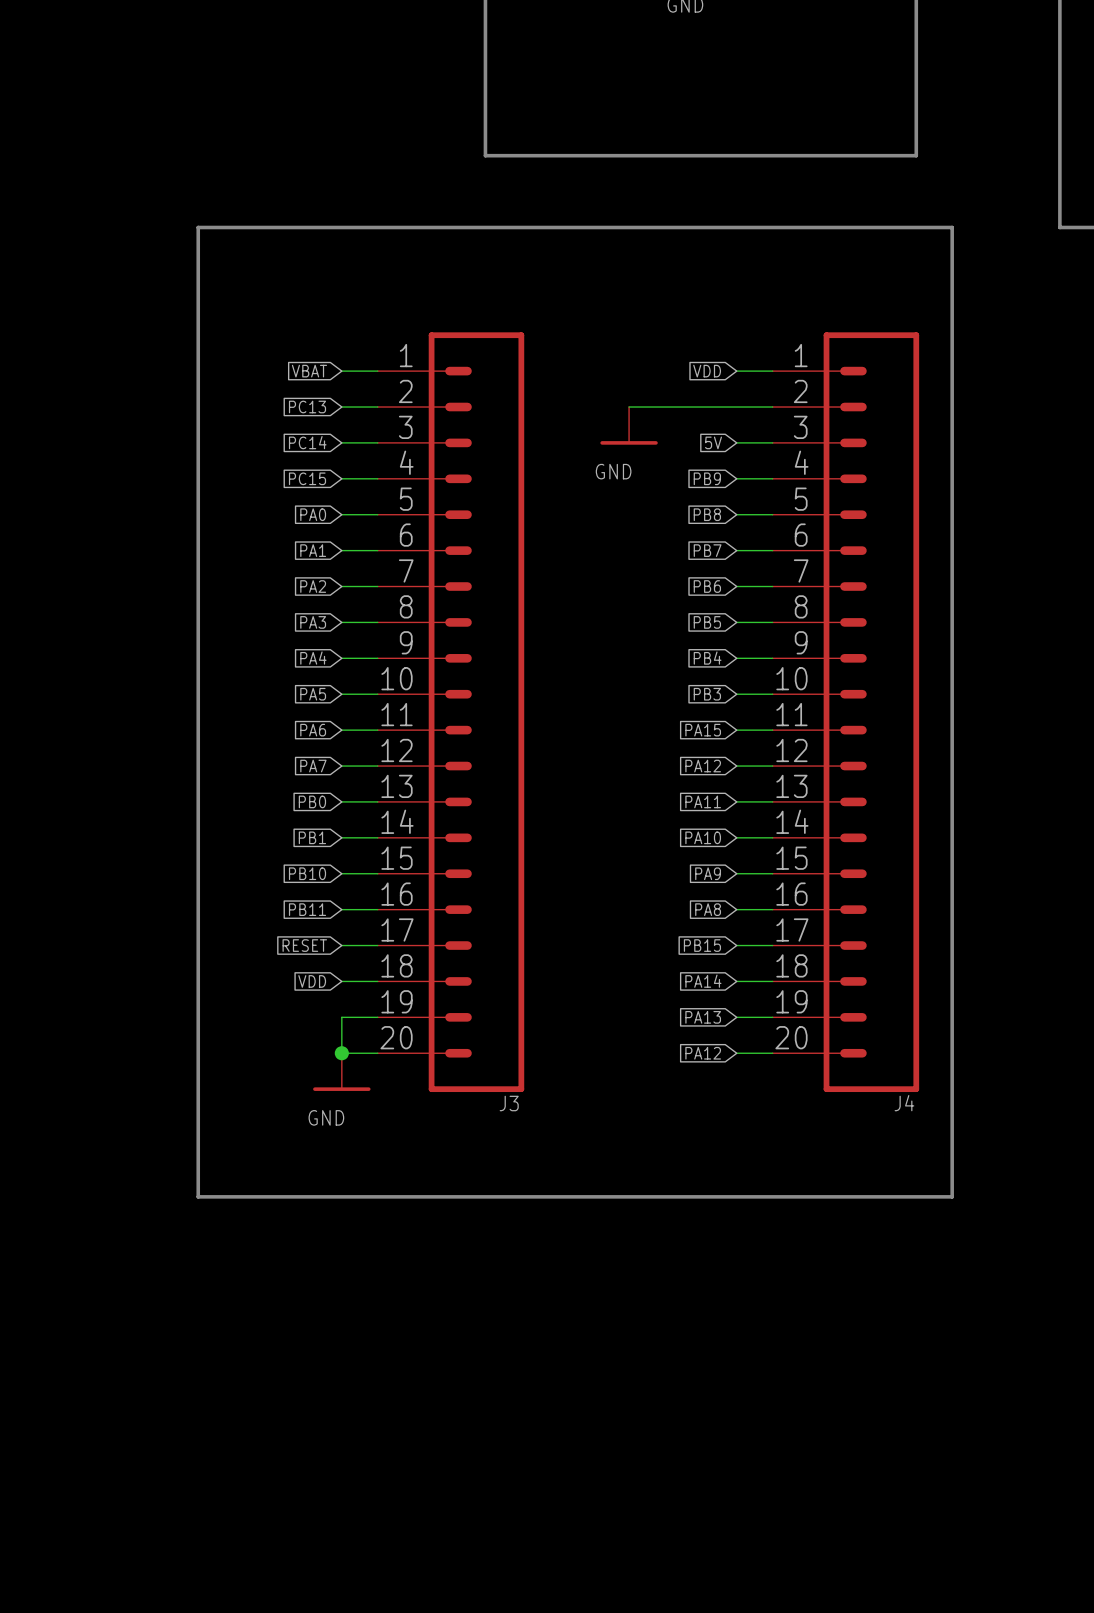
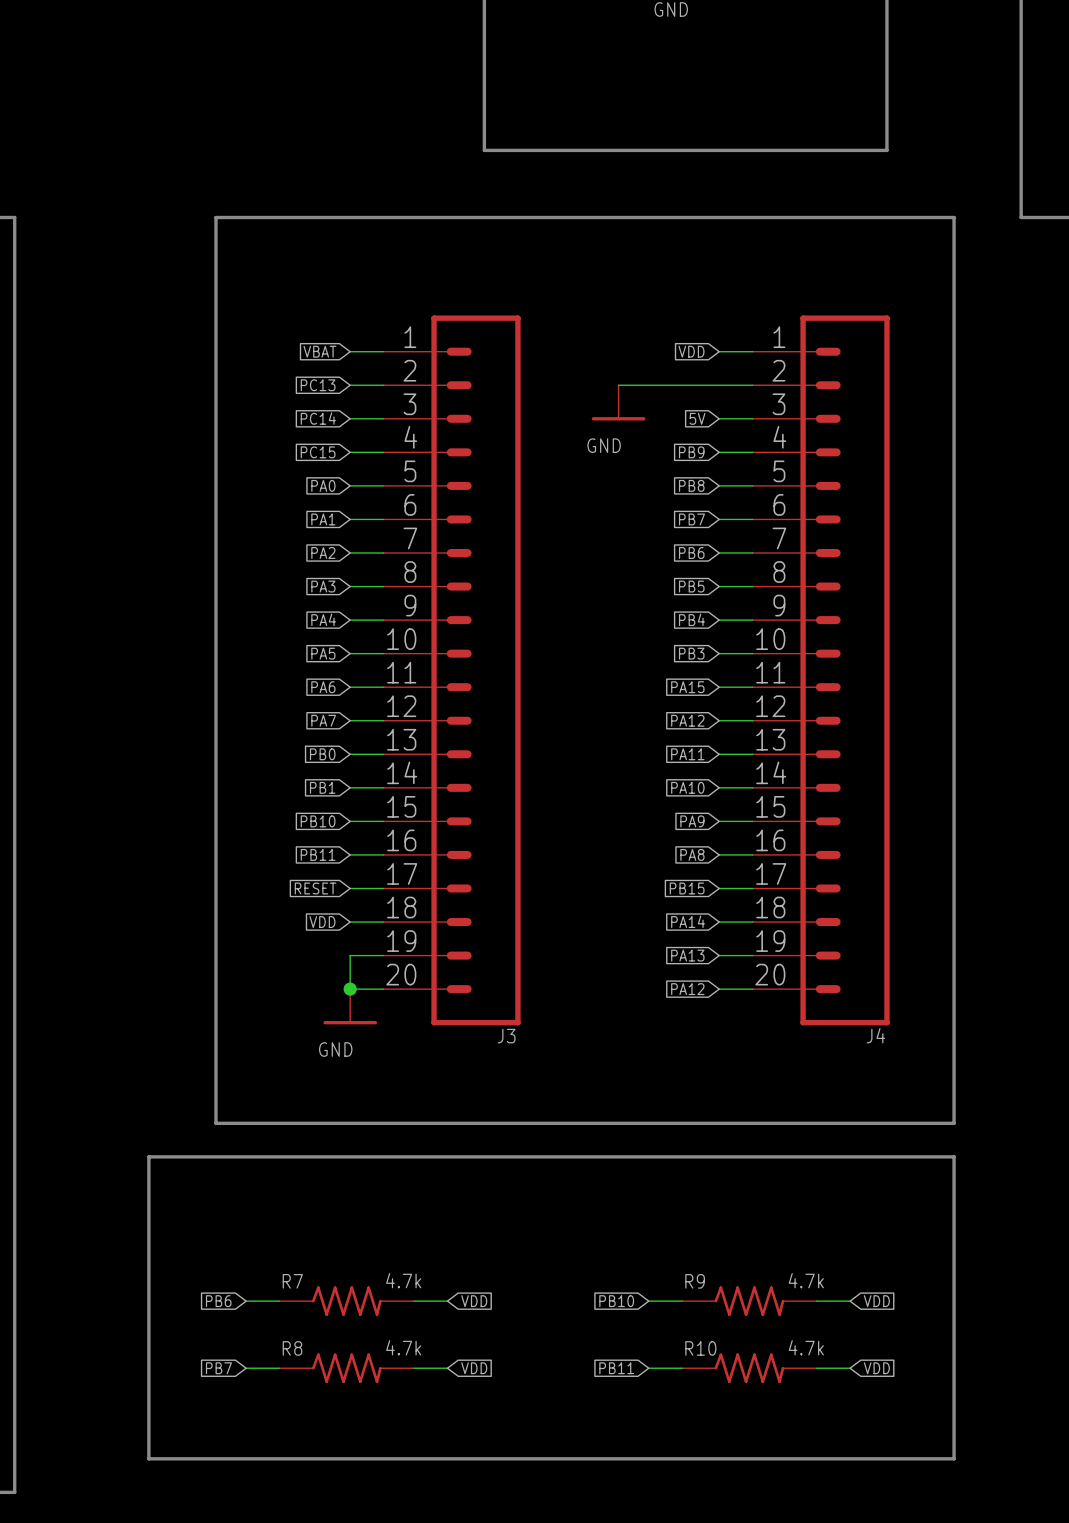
line: (952, 227) (952, 1196) -> (920, 217) (954, 217) (954, 1123) (920, 1123)
line: none -> (148, 1156) (954, 1156) (954, 1458) (148, 1458) (148, 1156)
global label: none -> PB6 (218, 1301)
wire: none -> (246, 1301) (279, 1301)
R7: none -> 4.7k (346, 1301)
wire: none -> (413, 1301) (447, 1301)
global label: none -> VDD (474, 1301)
global label: none -> PB10 (616, 1301)
wire: none -> (648, 1301) (682, 1301)
R9: none -> 4.7k (749, 1301)
wire: none -> (816, 1301) (850, 1301)
global label: none -> VDD (876, 1301)
global label: none -> PB7 (218, 1368)
wire: none -> (246, 1368) (279, 1368)
R8: none -> 4.7k (346, 1368)
wire: none -> (413, 1368) (447, 1368)
global label: none -> VDD (474, 1368)
global label: none -> PB11 (616, 1368)
wire: none -> (648, 1368) (682, 1368)
R10: none -> 4.7k (749, 1368)
wire: none -> (816, 1368) (850, 1368)
global label: none -> VDD (876, 1368)

